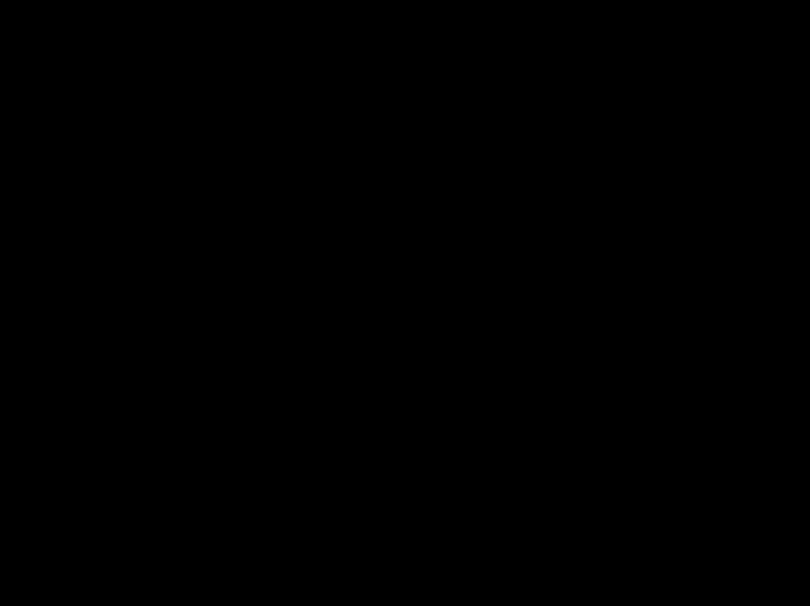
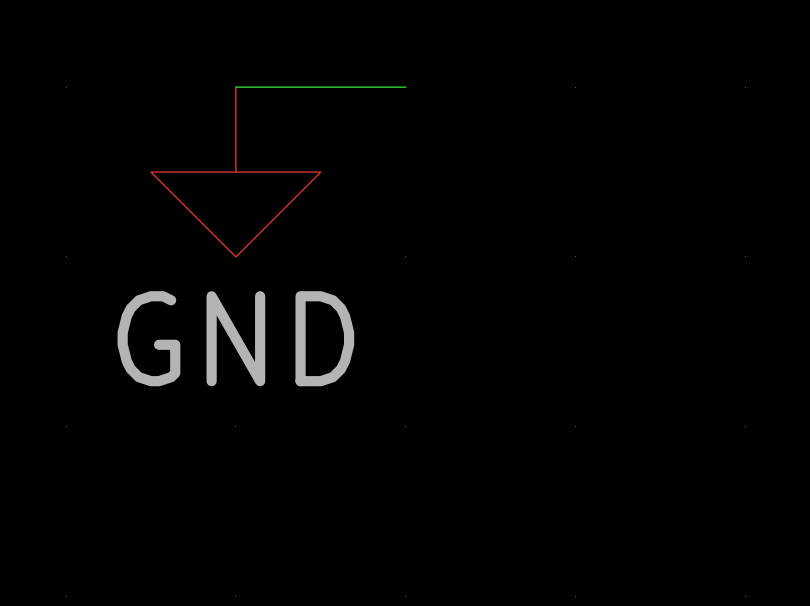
wire: none -> (235, 87) (405, 87)
power symbol: none -> GND (235, 172)

